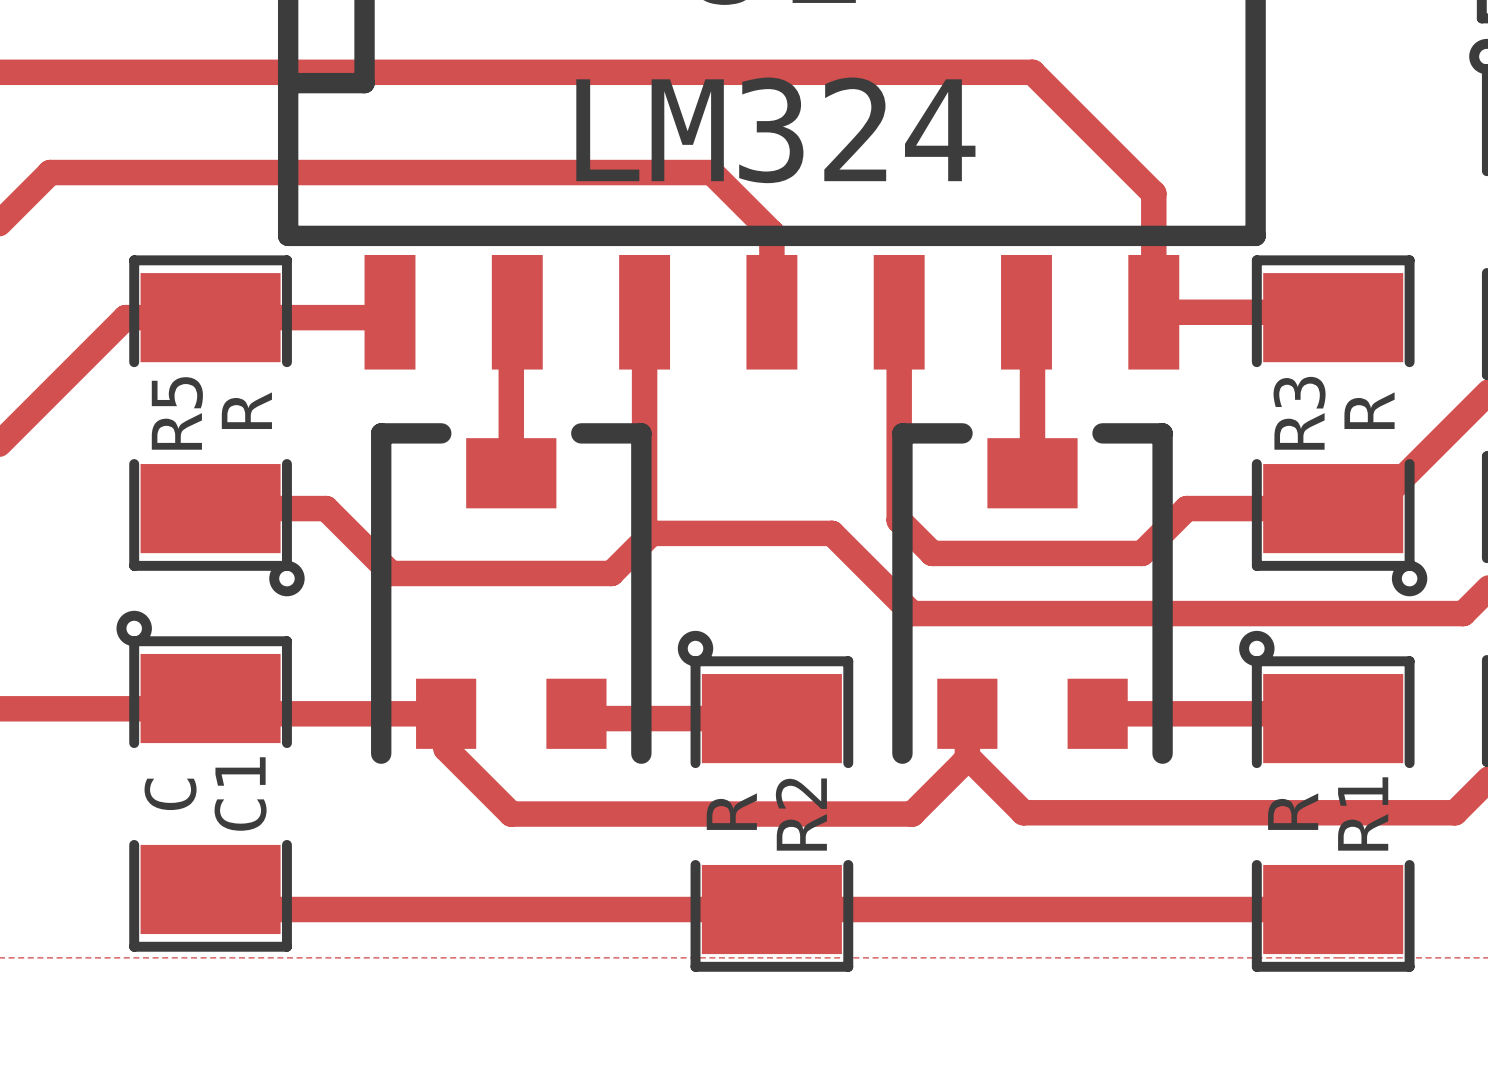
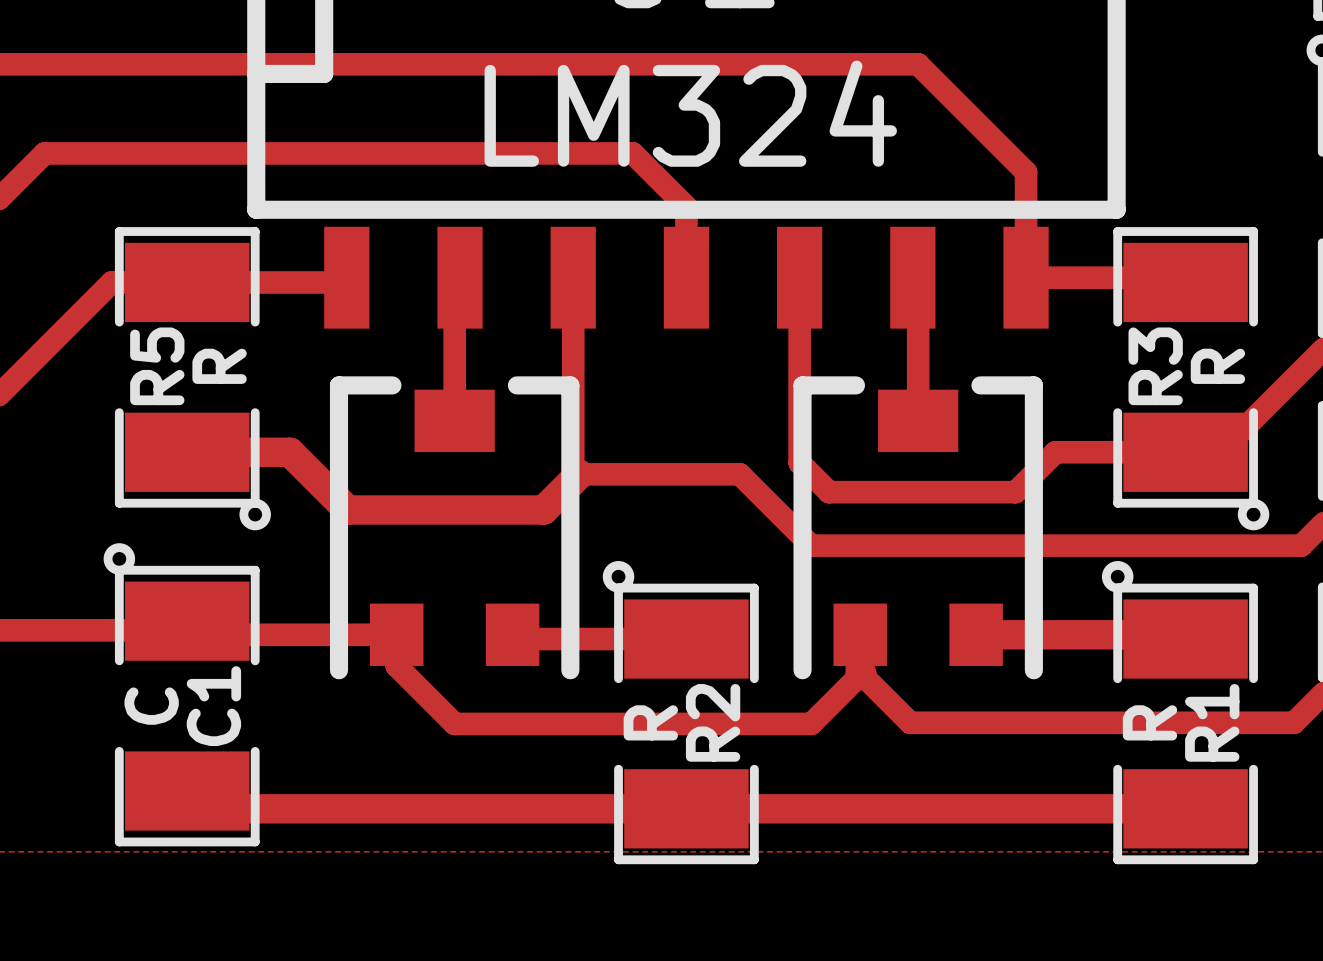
track width: thin (210, 508) (326, 508) (391, 573) (611, 573) (651, 533) -> thick (187, 452) (290, 452) (347, 510) (543, 510) (579, 474)
track width: thin (1097, 713) (1328, 713) (1333, 718) -> thick (976, 634) (1181, 634) (1185, 639)
track width: thin (210, 889) (230, 909) (1333, 909) -> thick (187, 791) (205, 808) (1185, 808)

